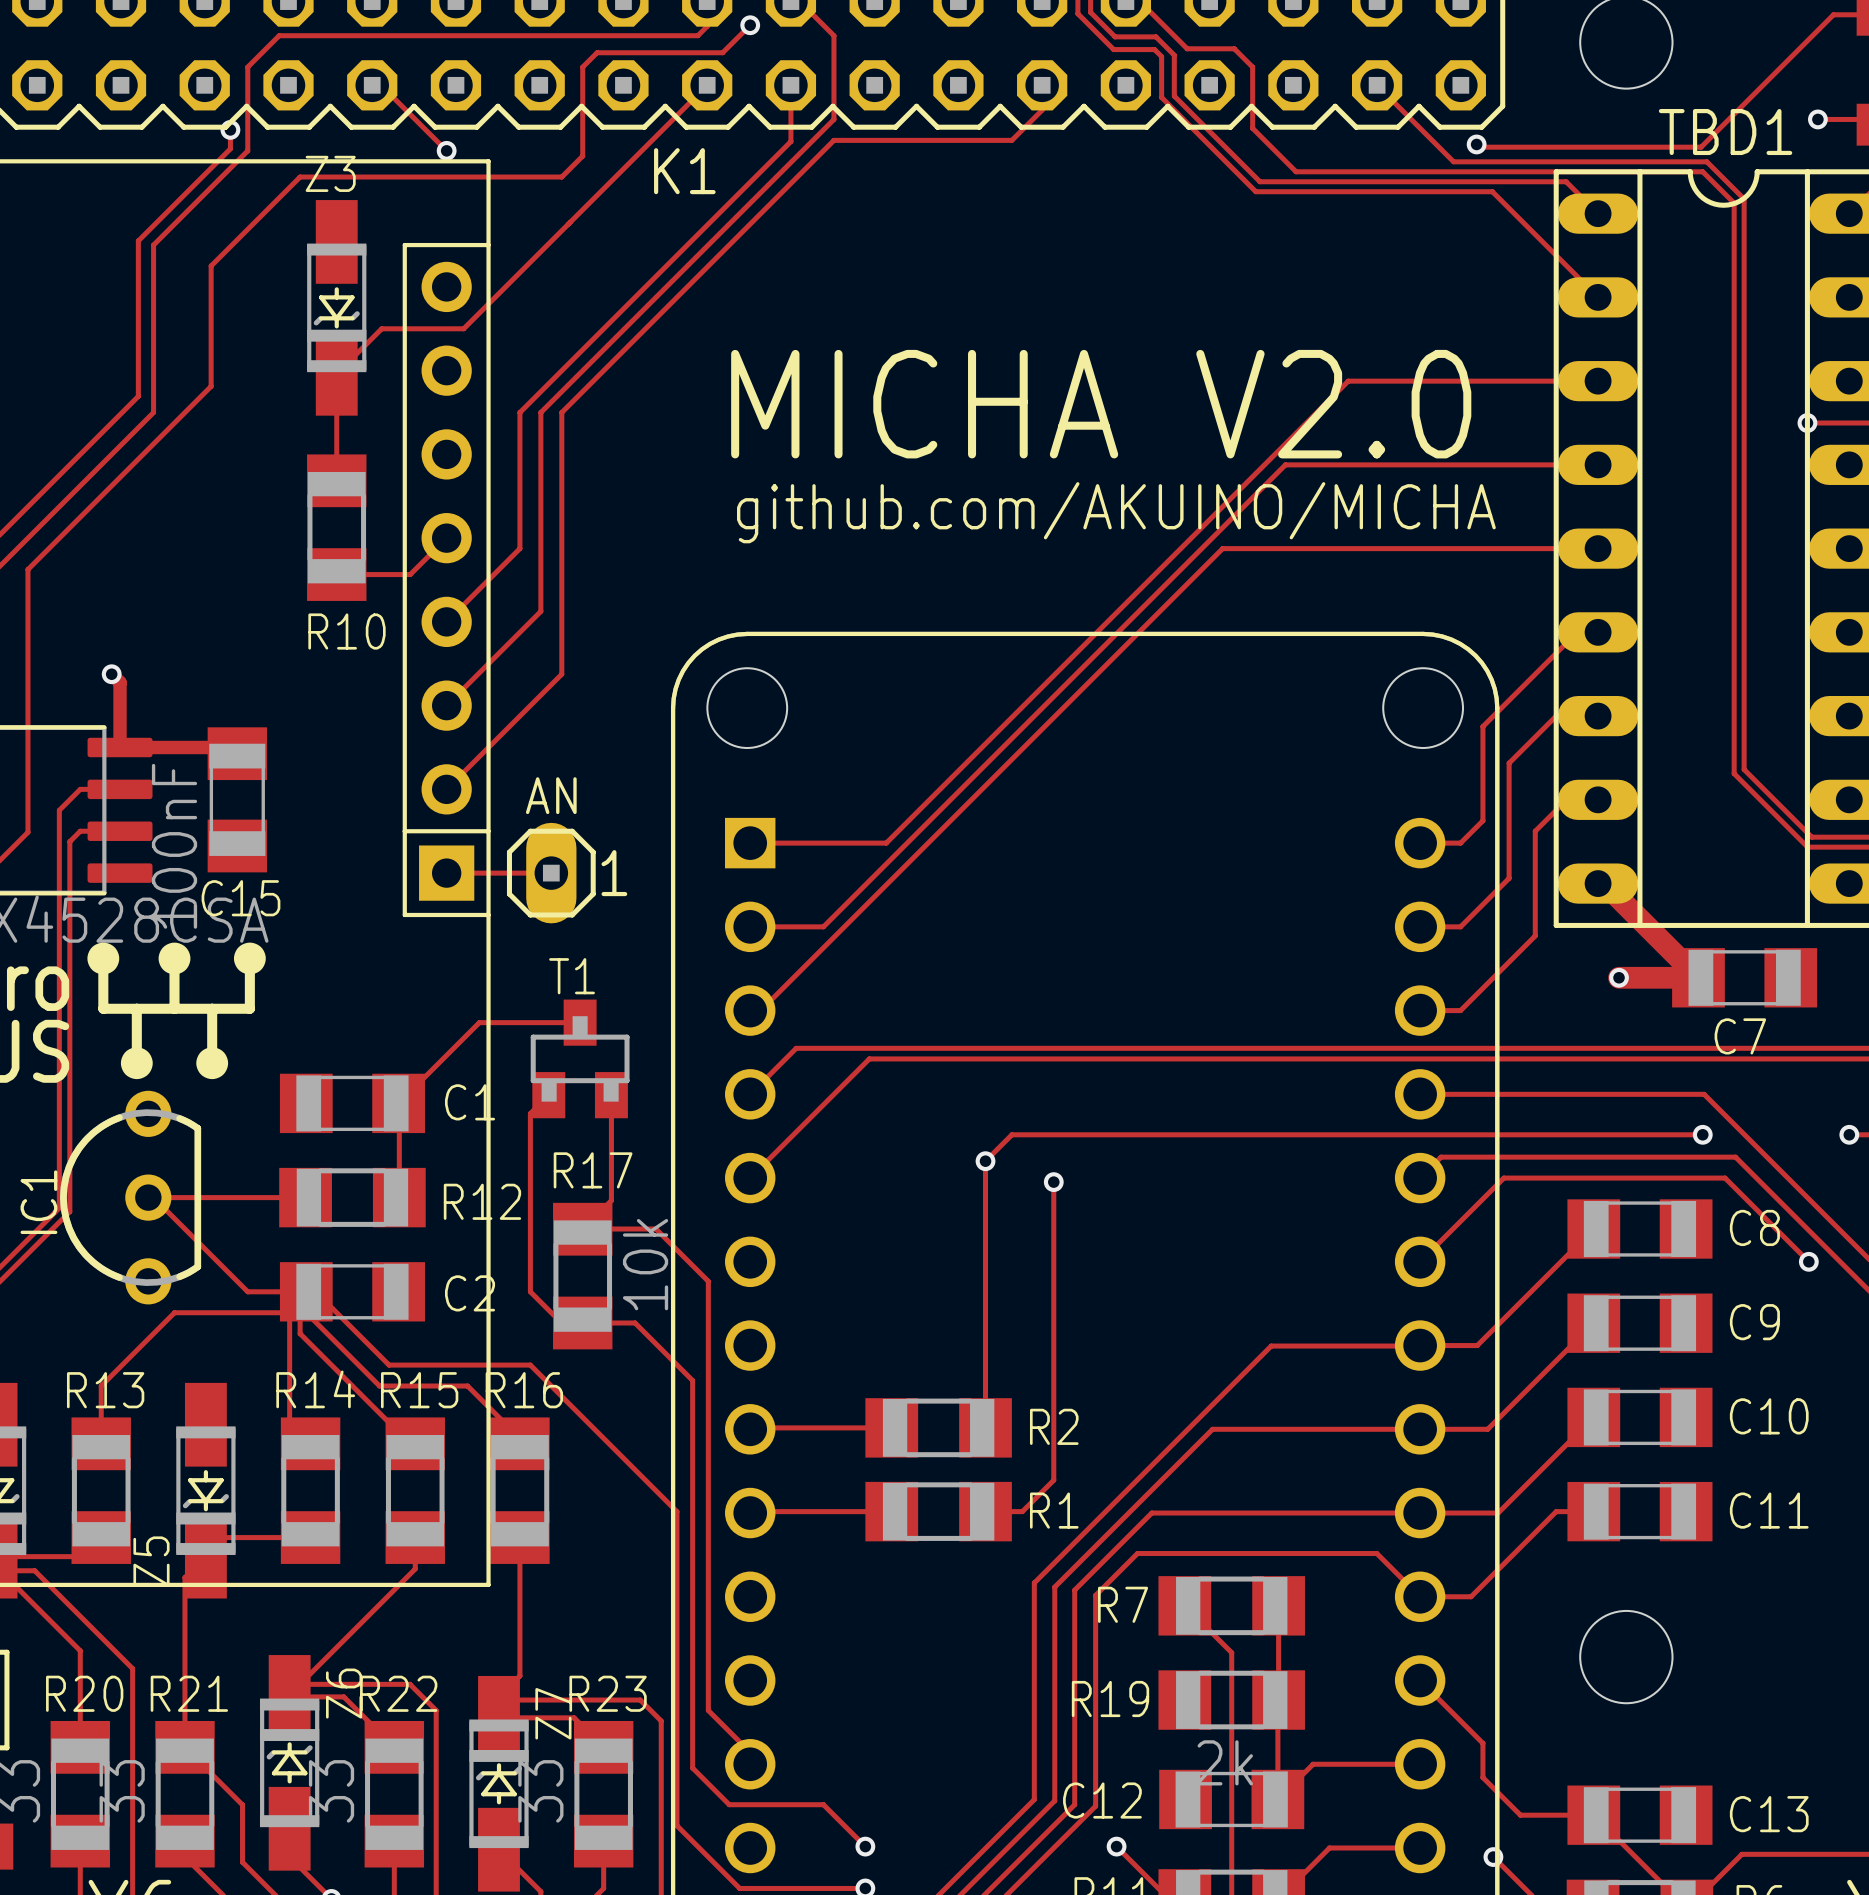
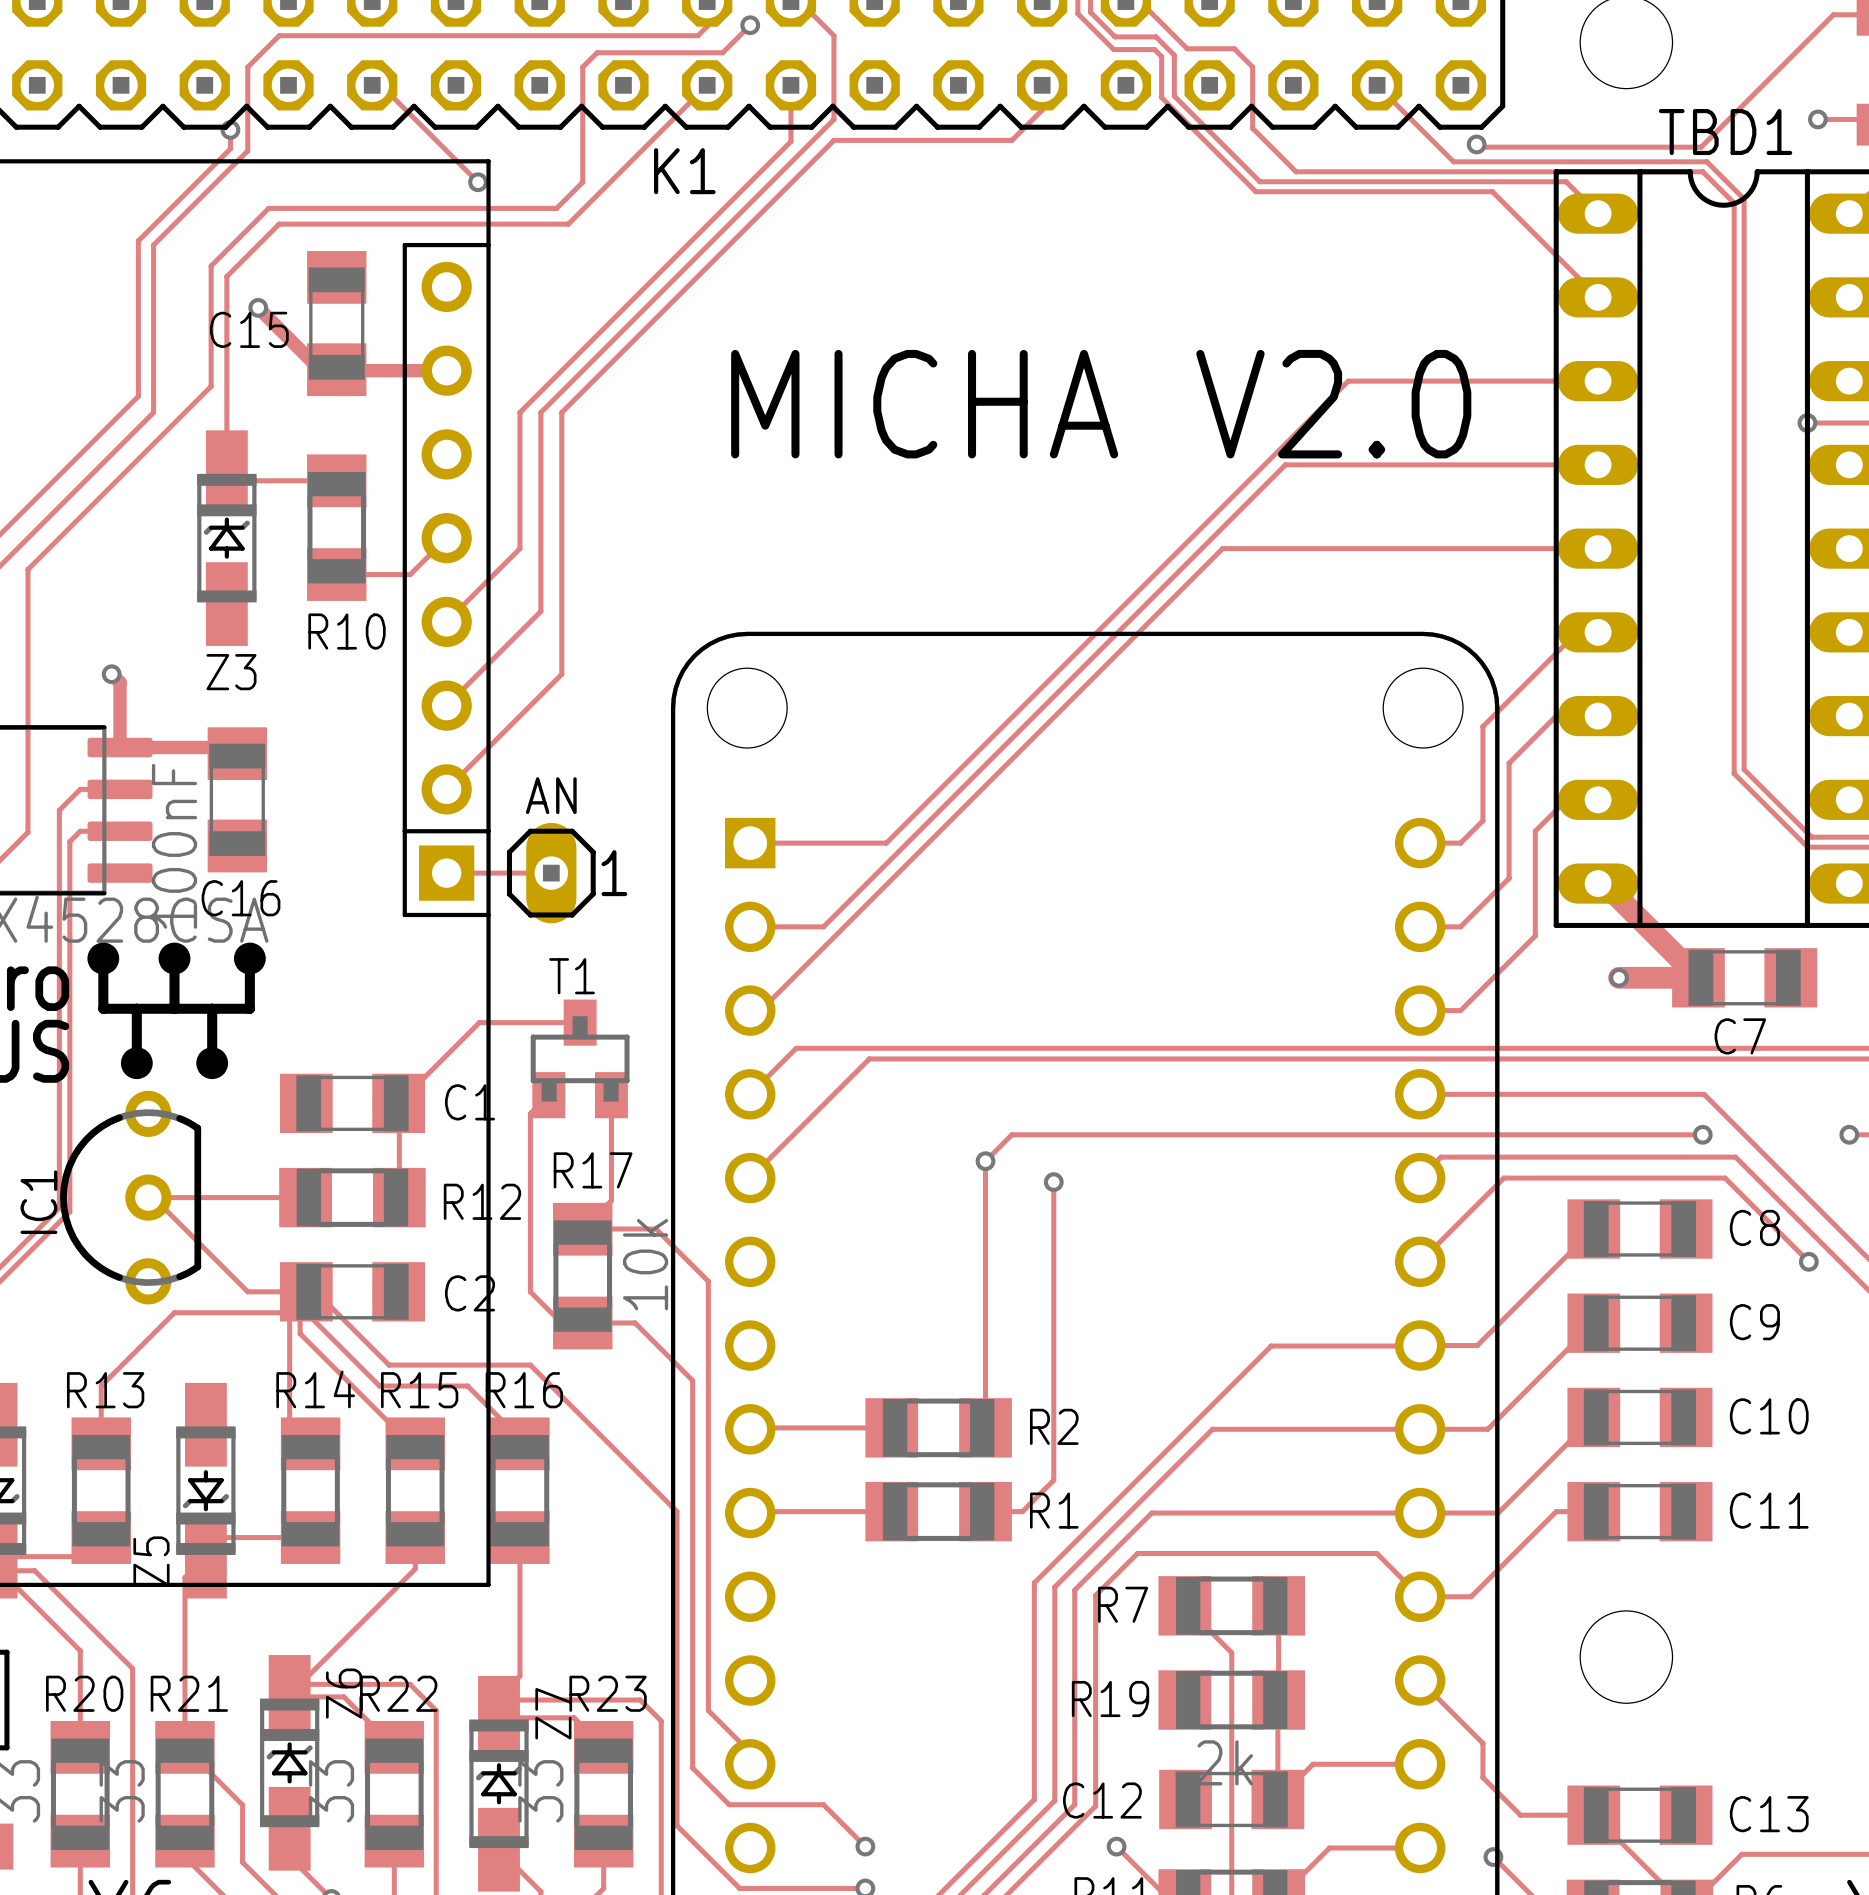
track: none -> (446, 150) (478, 182)
via position: (446, 150) -> (478, 182)
track: (582, 156) (561, 177) (300, 177) (268, 208) -> (582, 156) (582, 182) (556, 208) (268, 208)
track: (568, 224) (463, 328) (381, 328) (336, 373) (336, 480) -> (568, 224) (279, 224) (226, 276) (226, 472) (235, 480) (336, 480)
track: none -> (258, 307) (320, 369) (446, 370)
via: none -> (258, 307)
Z3 rotation: 0° (336, 307) -> 180° (226, 538)
Z3 position: (336, 307) -> (226, 538)
C15: none -> (336, 323)
text: github.com/AKUINO/MICHA (1116, 512) -> none
C15 name: C15 (240, 898) -> C16 (240, 898)

